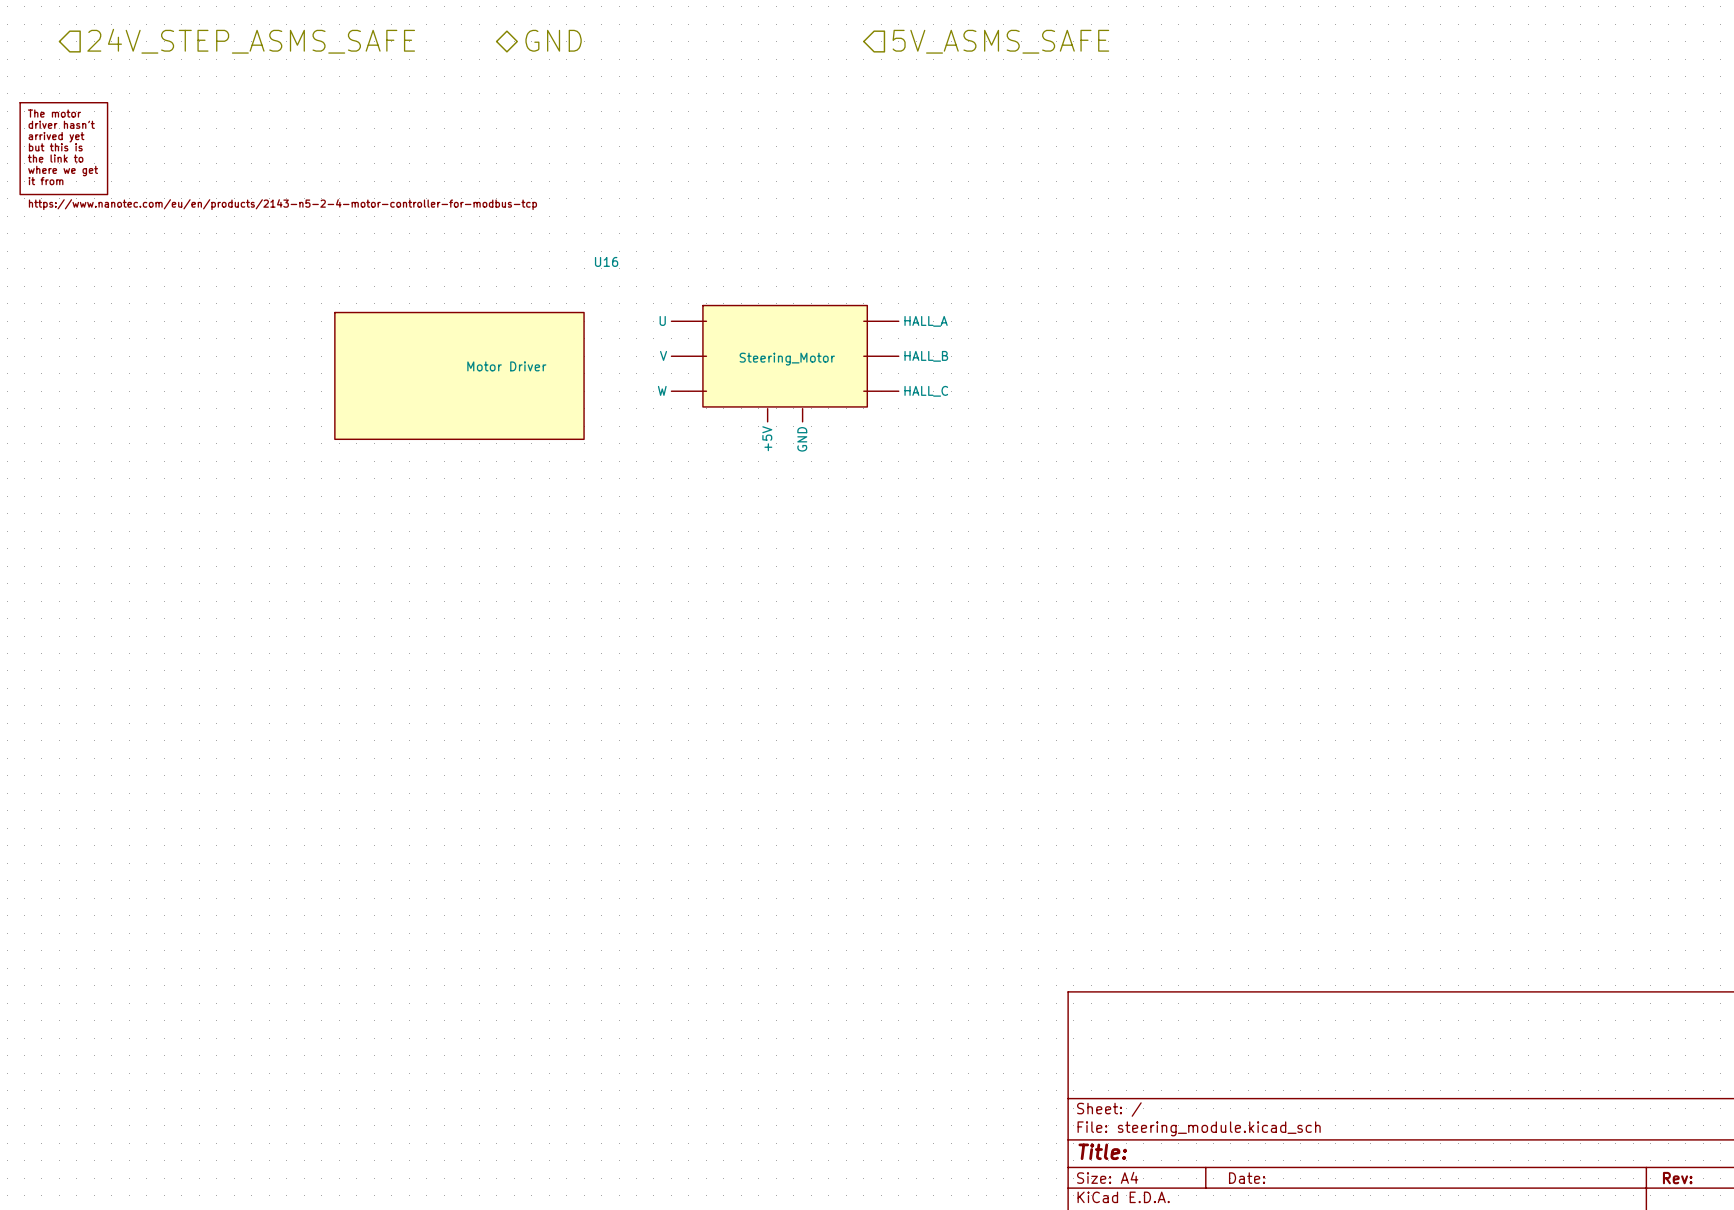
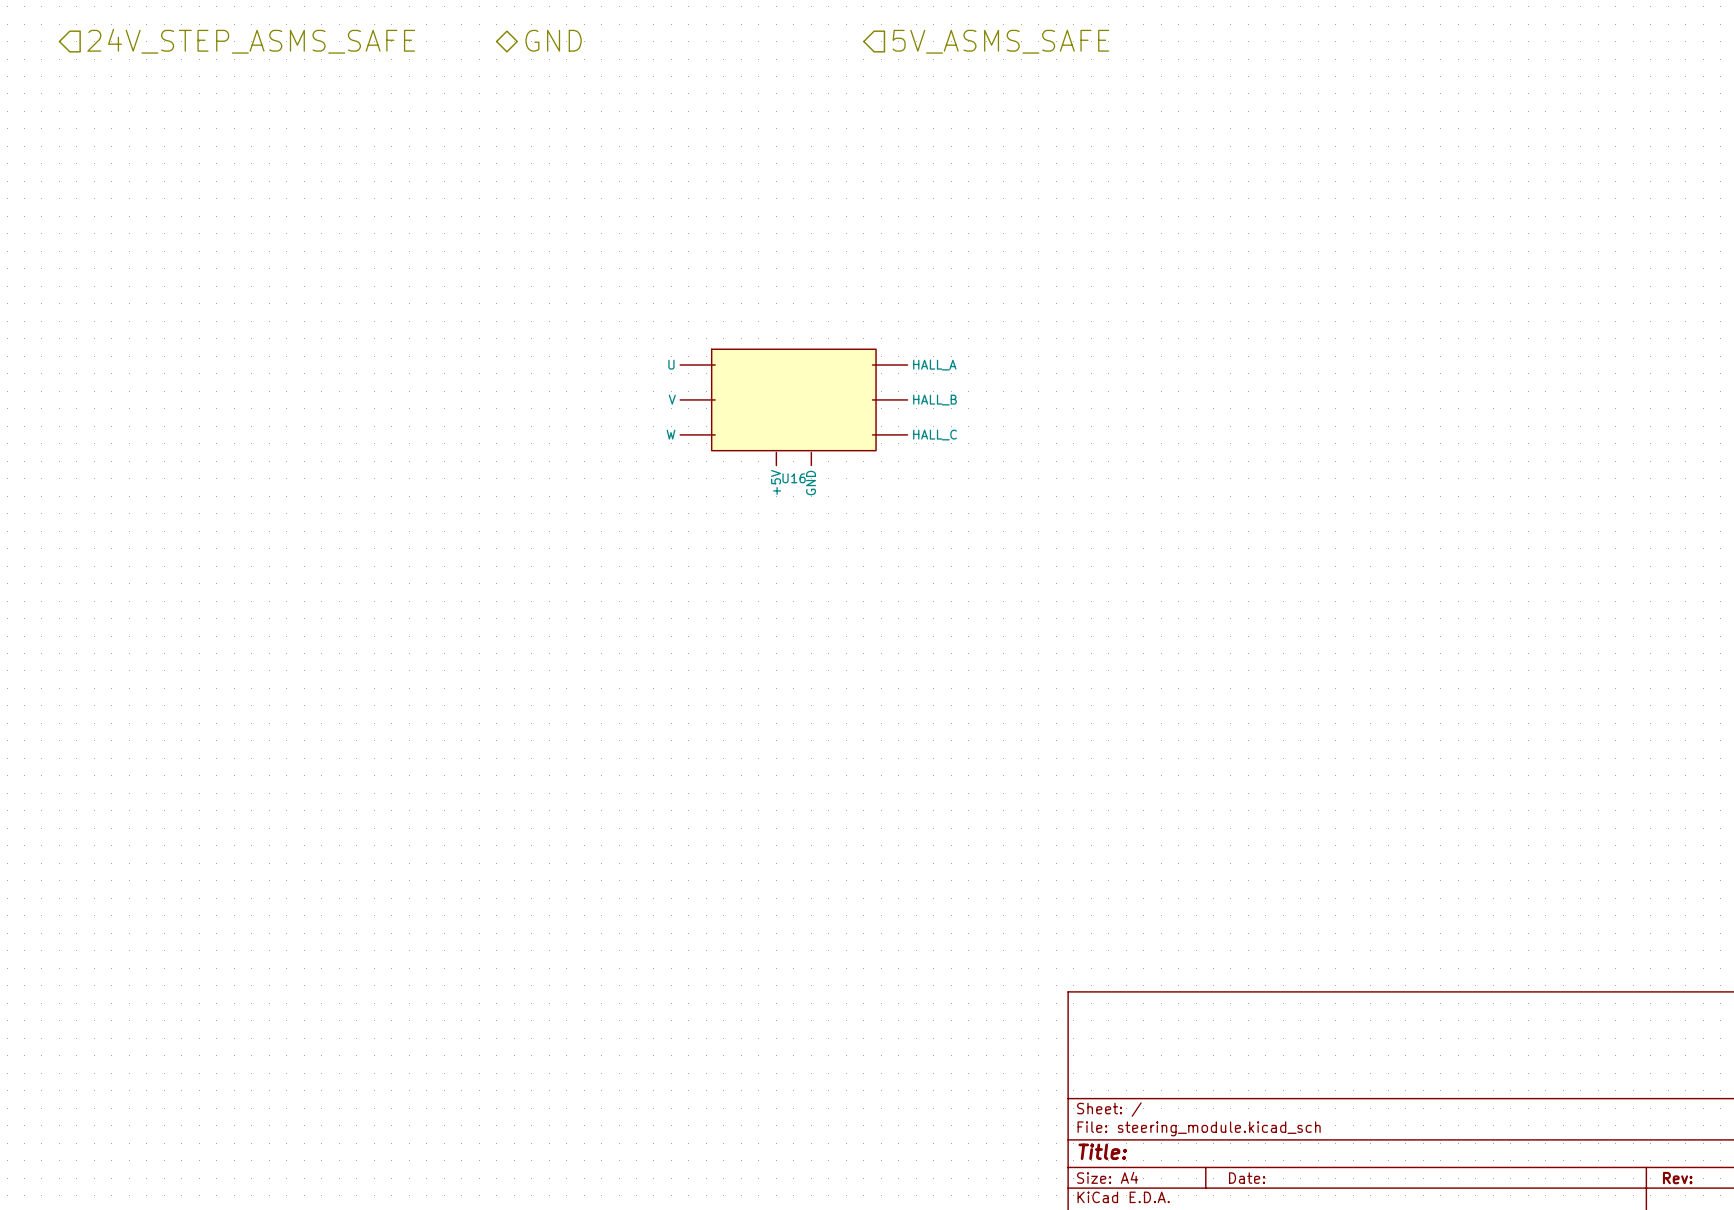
U16 symbol: [20, 102, 585, 440] -> [680, 349, 908, 466]
U16 name position: U16 (606, 261) -> U16 (794, 478)
Steering_Motor: (785, 363) -> none
U16 value: Motor Driver (506, 366) -> none

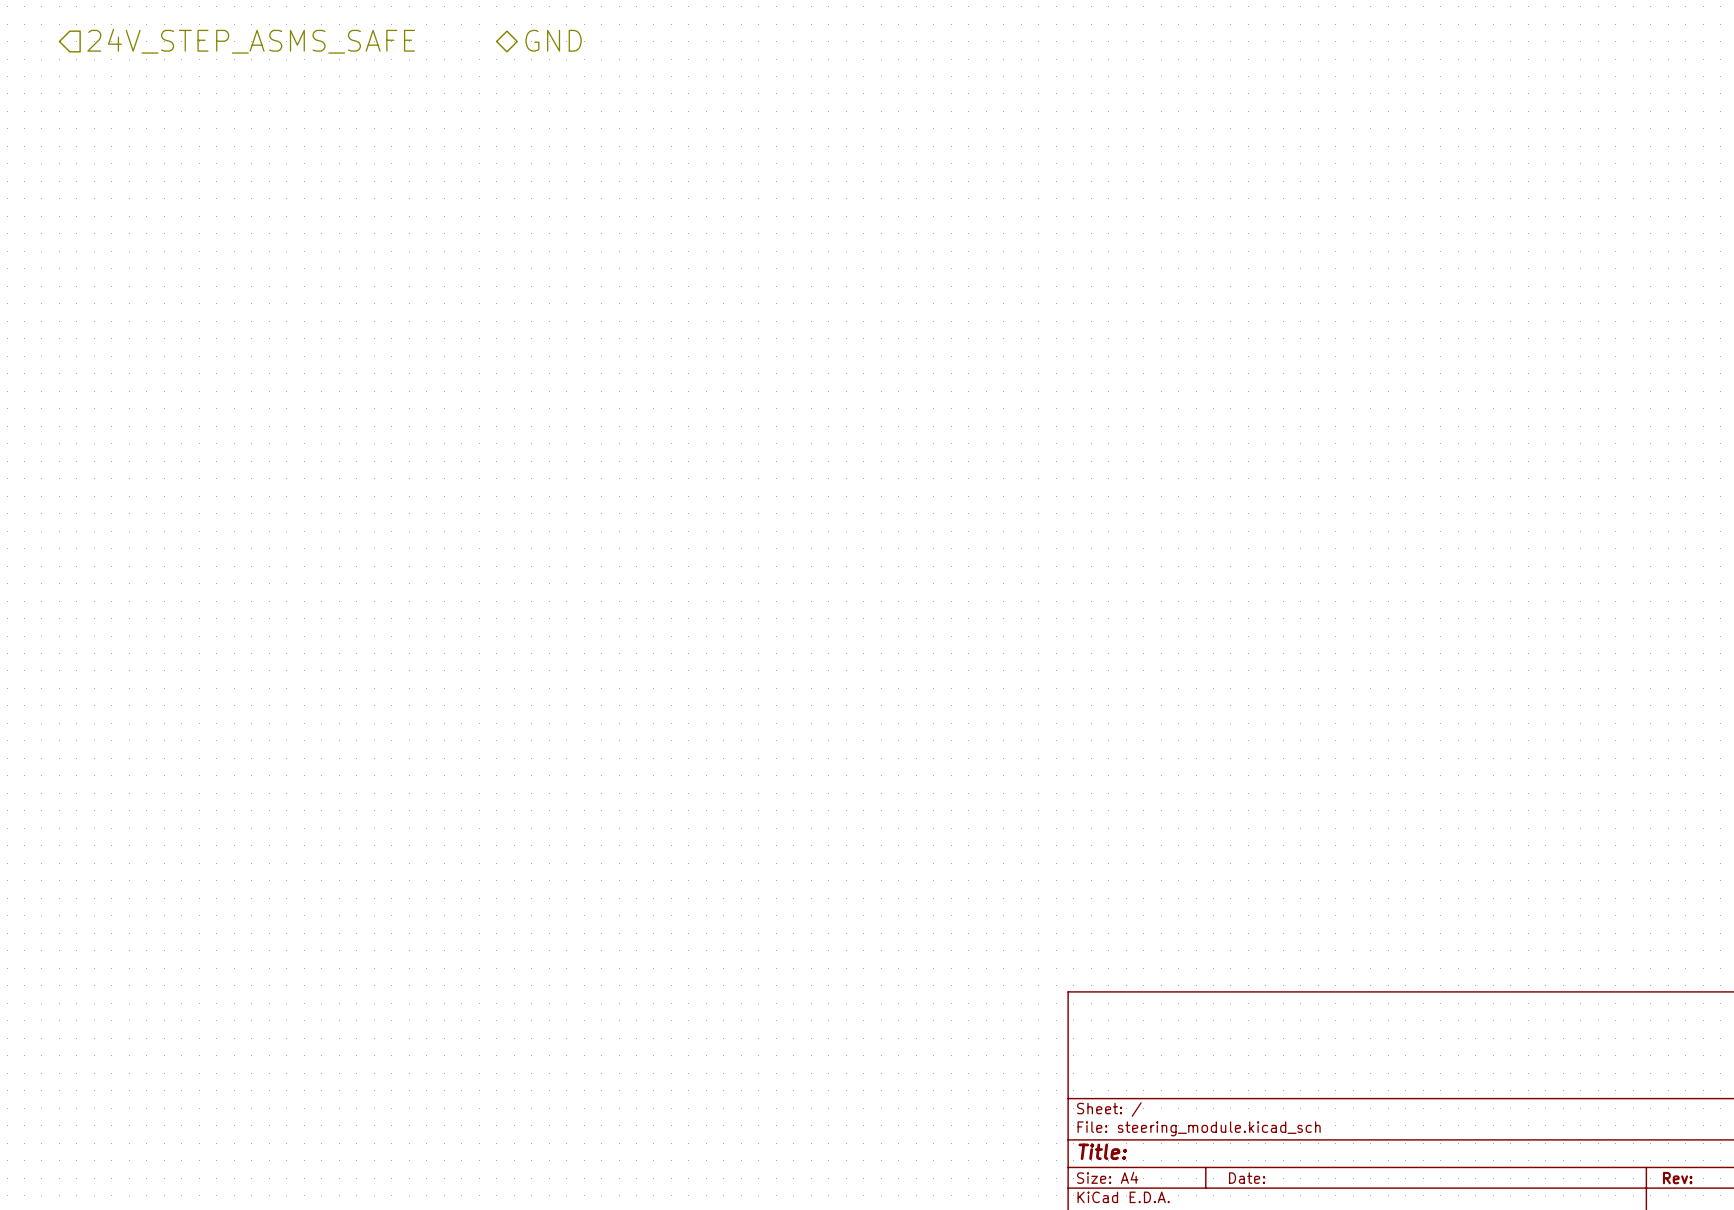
hierarchical label: 5V_ASMS_SAFE (1000, 41) -> none
U16: (793, 407) -> none

